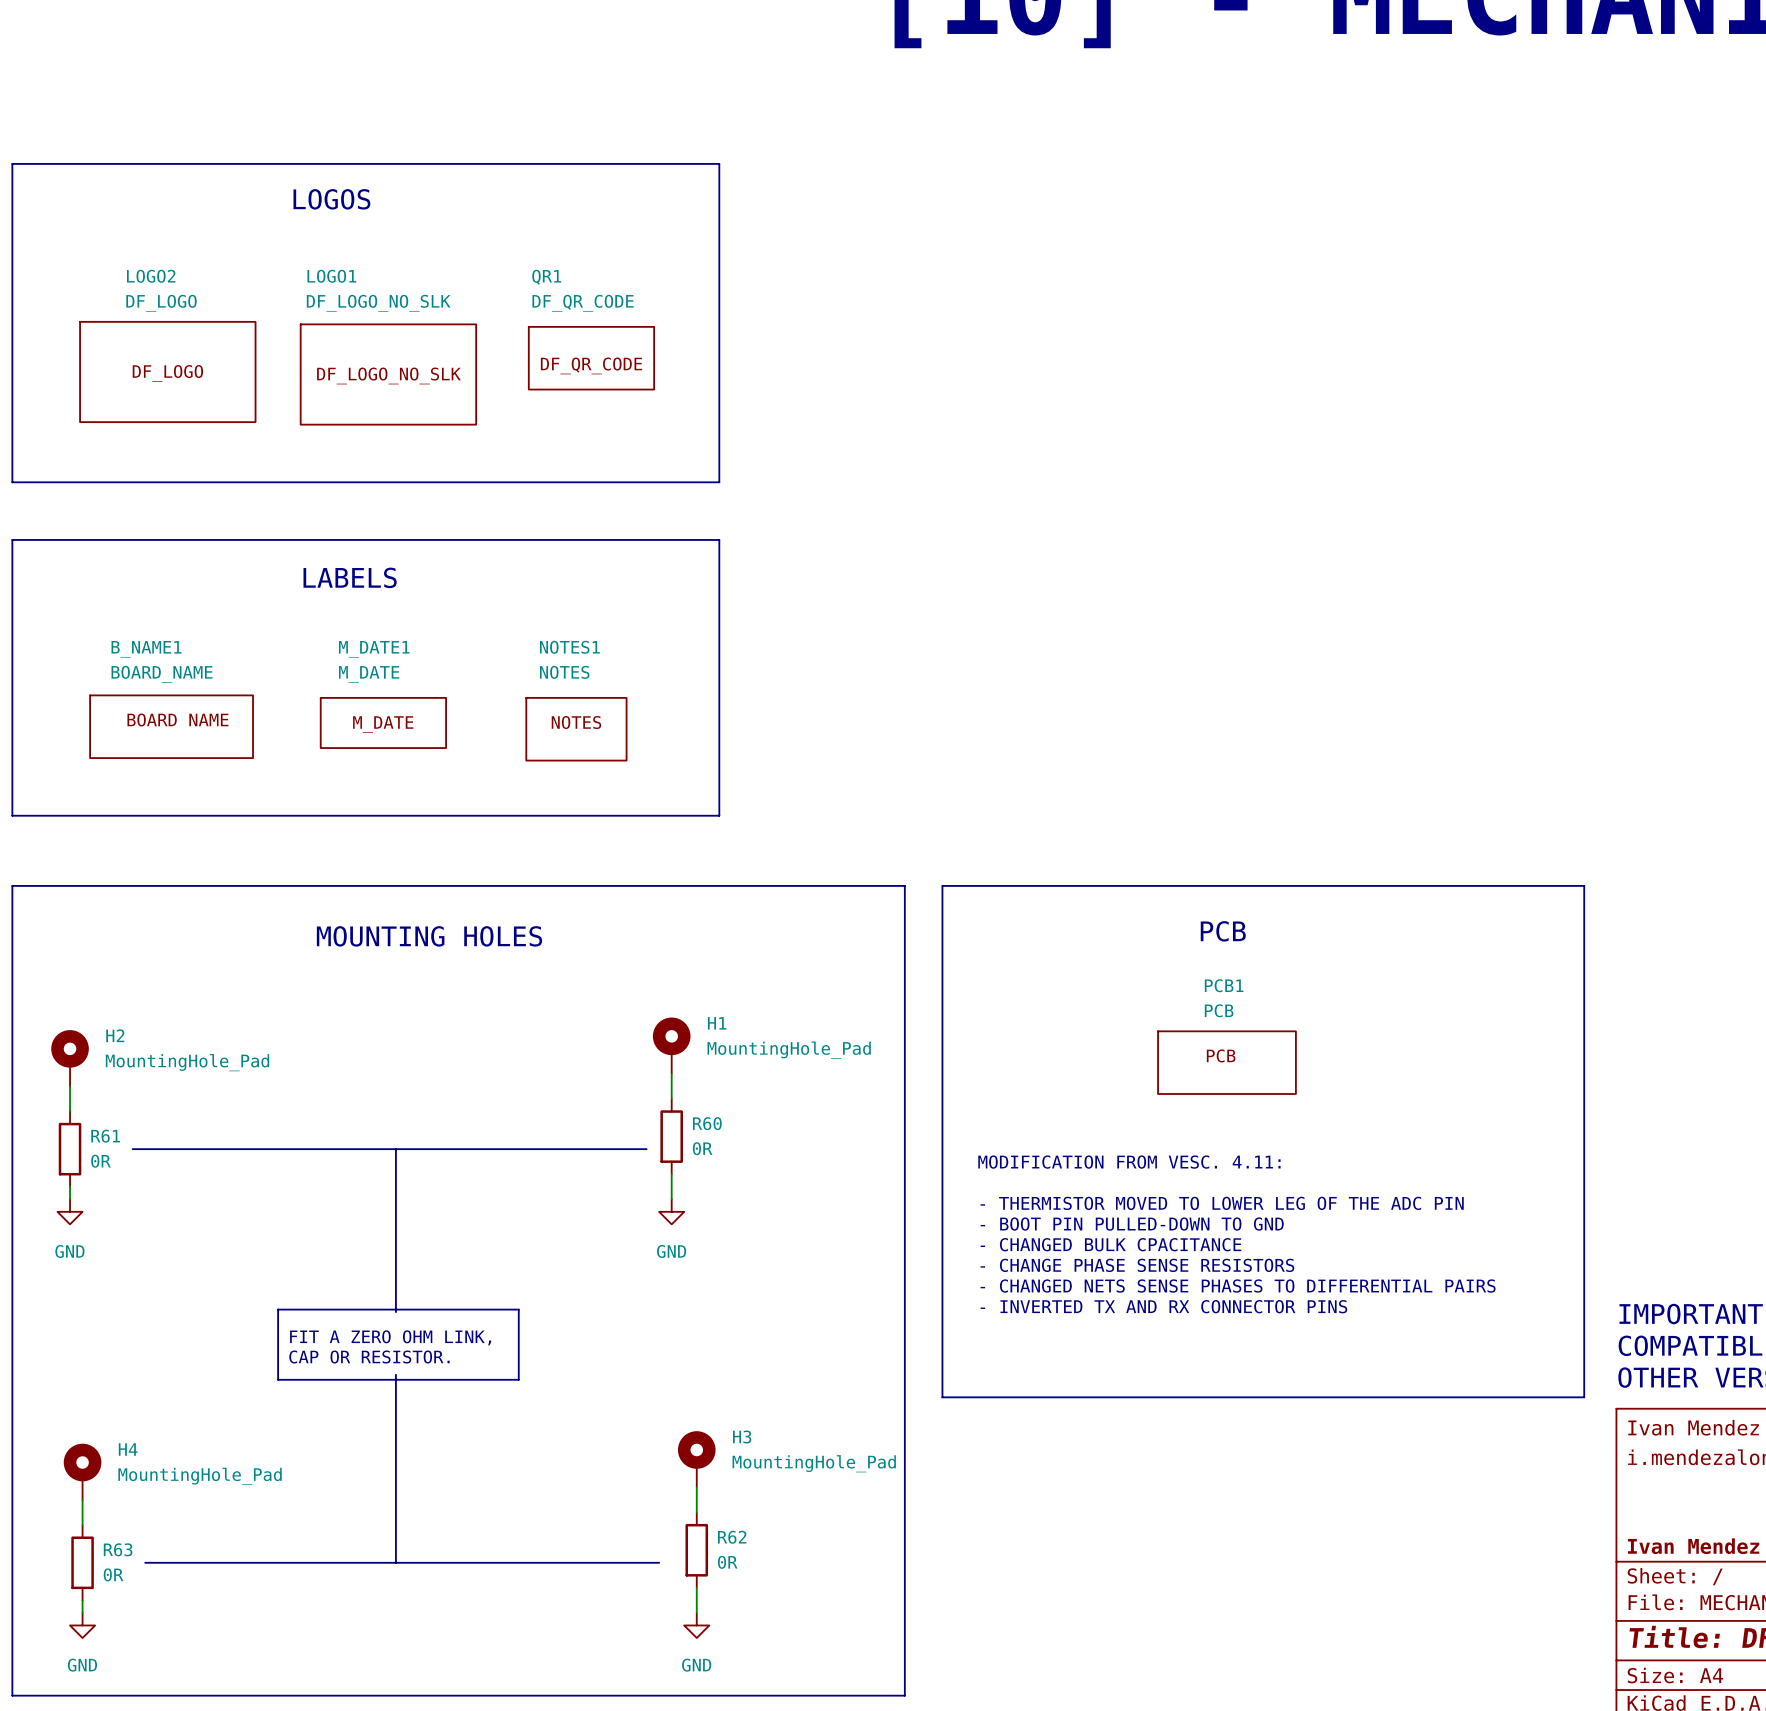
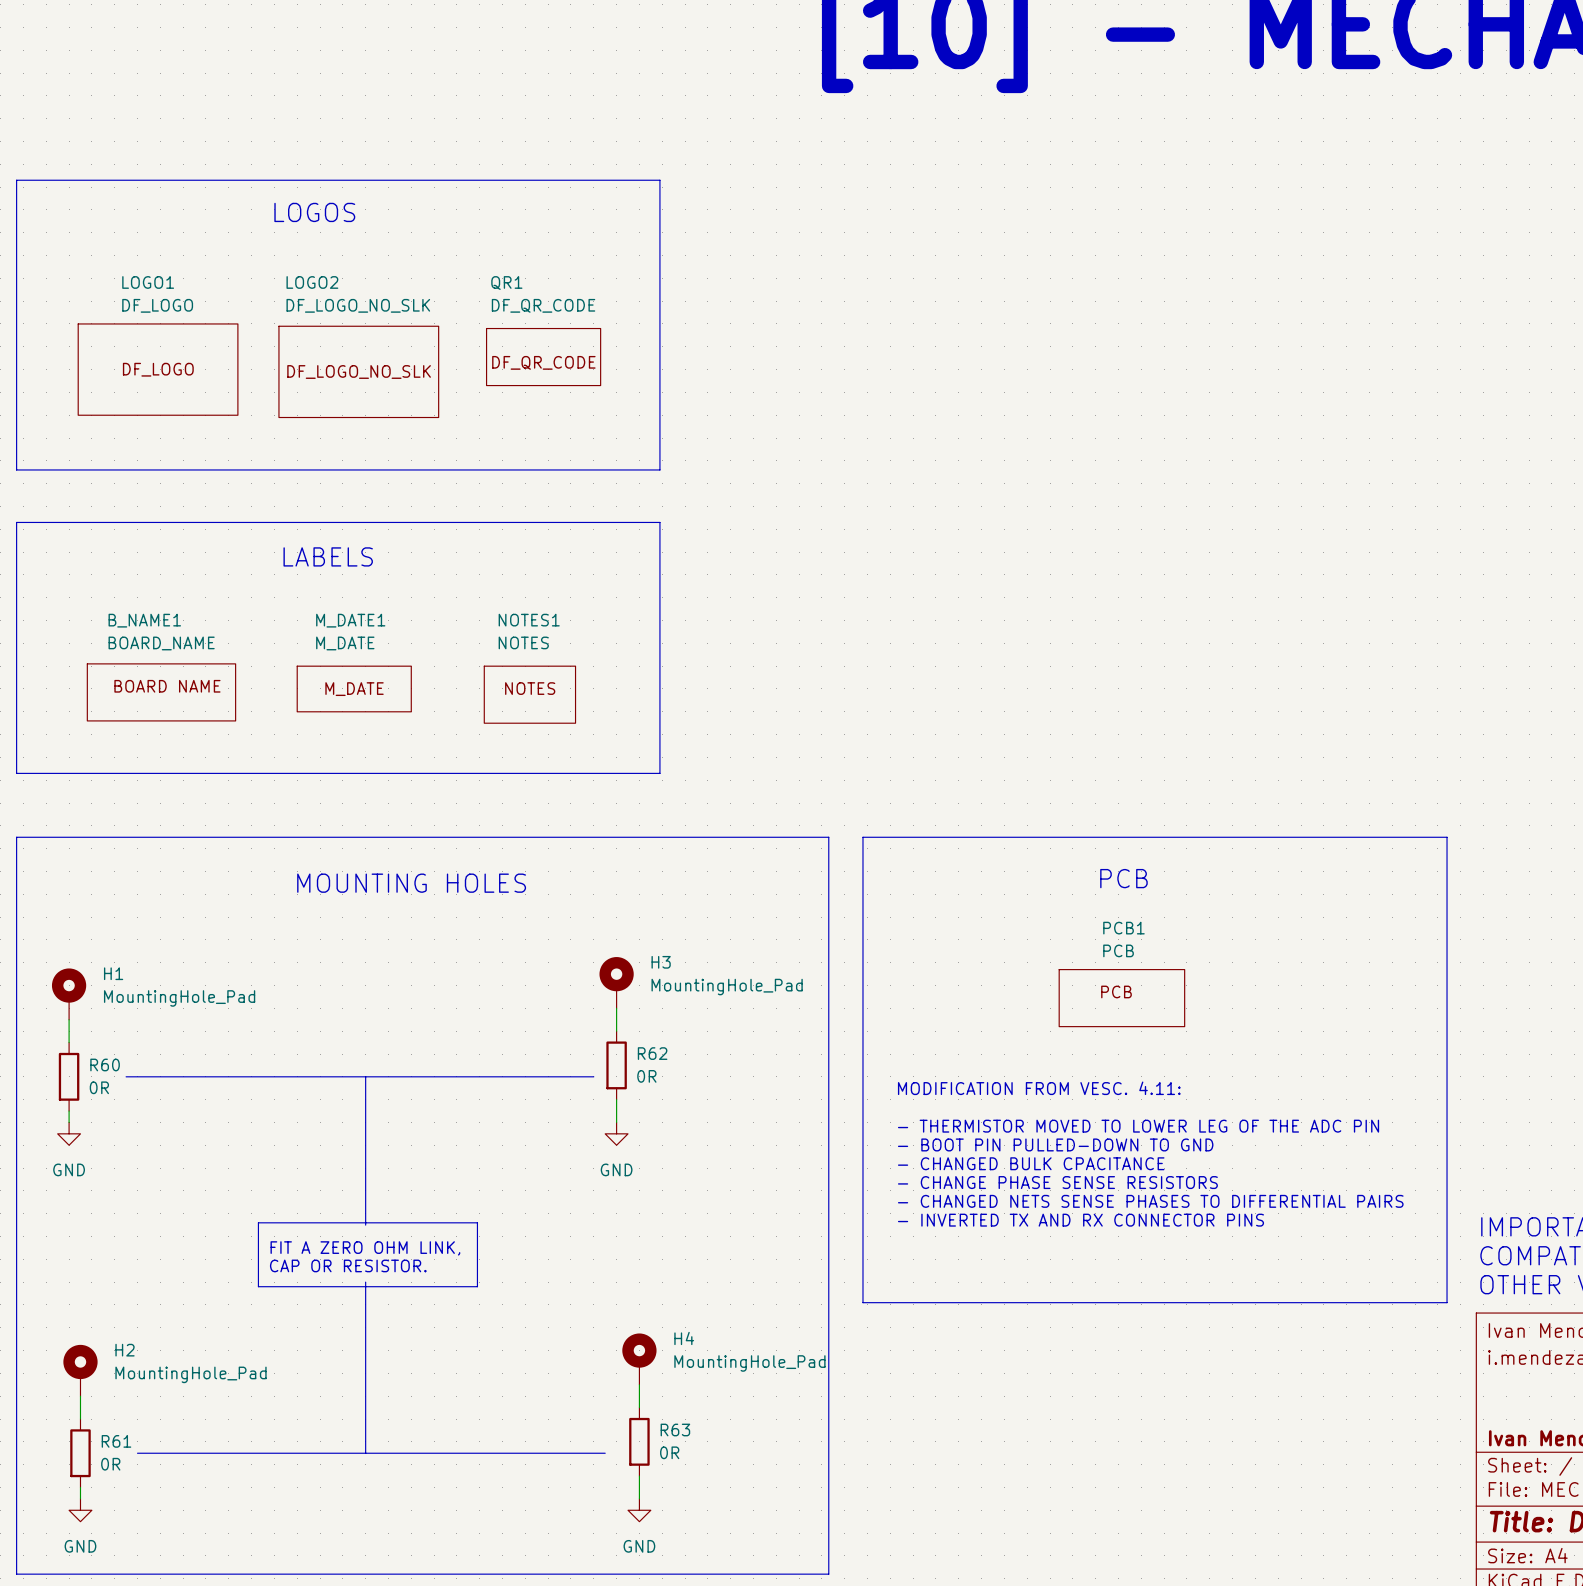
LOGO2 name: LOGO2 (151, 276) -> LOGO1 (148, 282)
LOGO1 name: LOGO1 (331, 276) -> LOGO2 (312, 282)
H1 name: H1 (717, 1023) -> H3 (661, 962)
H2 name: H2 (115, 1035) -> H1 (113, 973)
R60 name: R60 (707, 1123) -> R62 (652, 1053)
R61 name: R61 (105, 1136) -> R60 (105, 1064)
H3 name: H3 (742, 1436) -> H4 (684, 1338)
H4 name: H4 (128, 1449) -> H2 (125, 1350)
R62 name: R62 (732, 1537) -> R63 (675, 1430)
R63 name: R63 (118, 1549) -> R61 (116, 1441)

